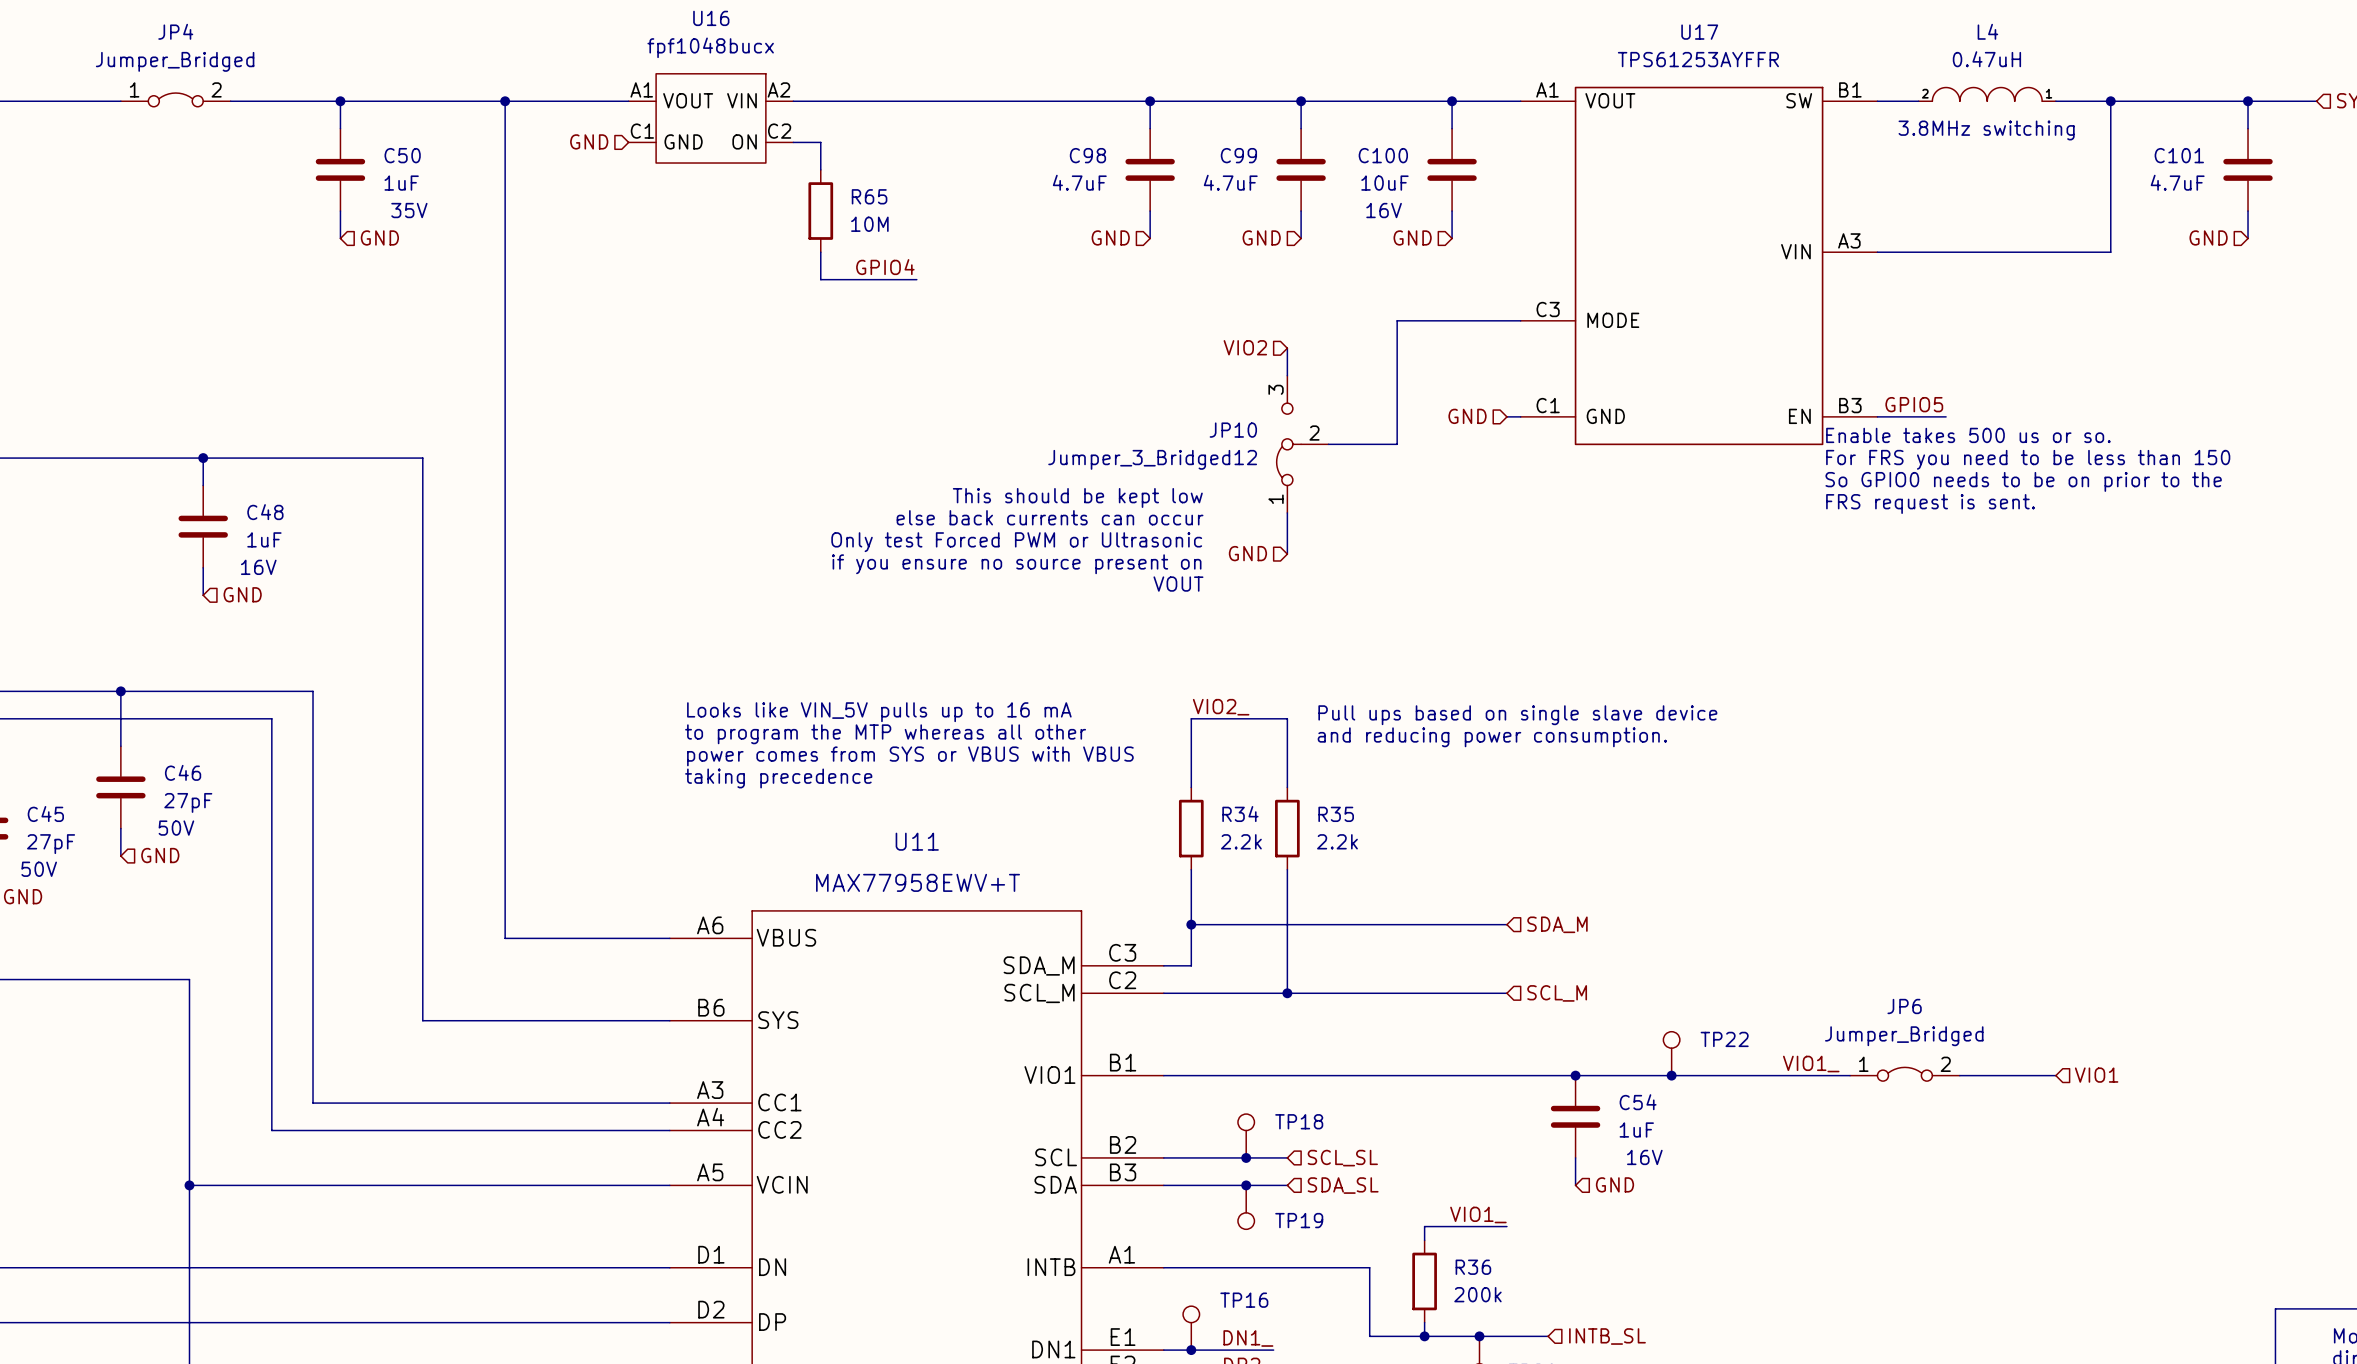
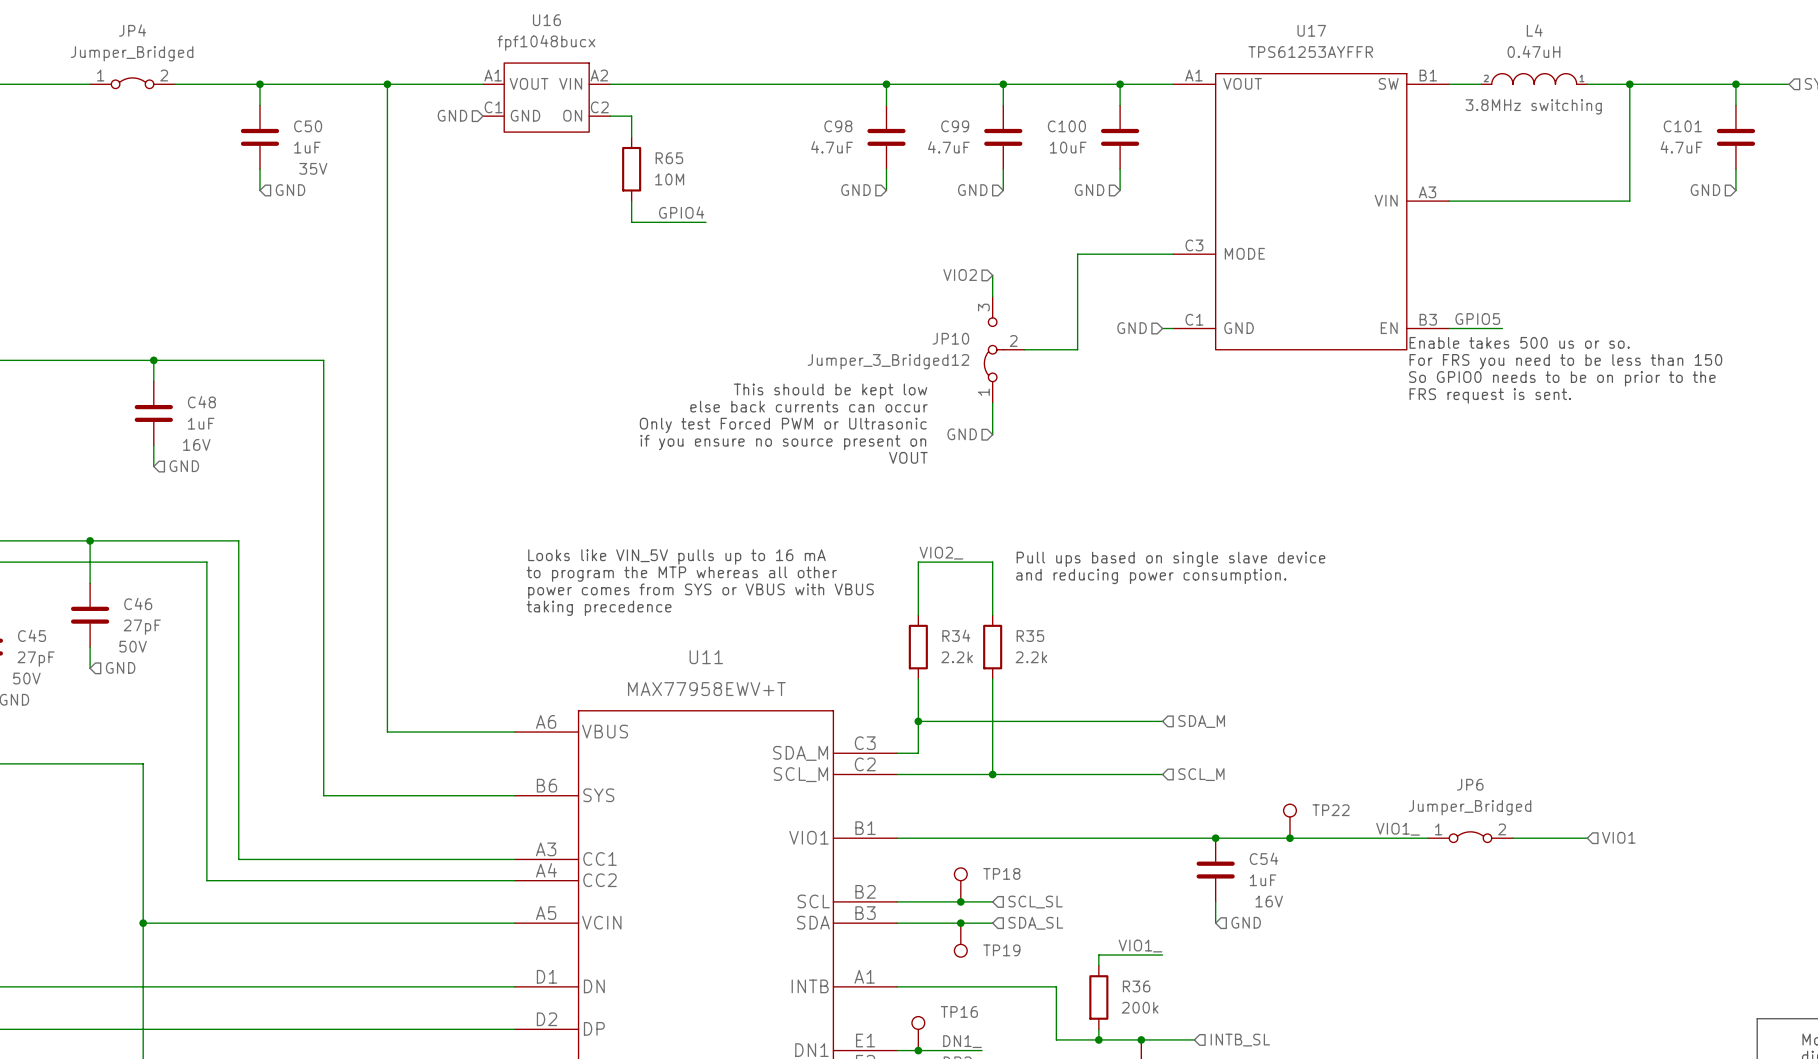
C100 text: 16V (1384, 210) -> none

